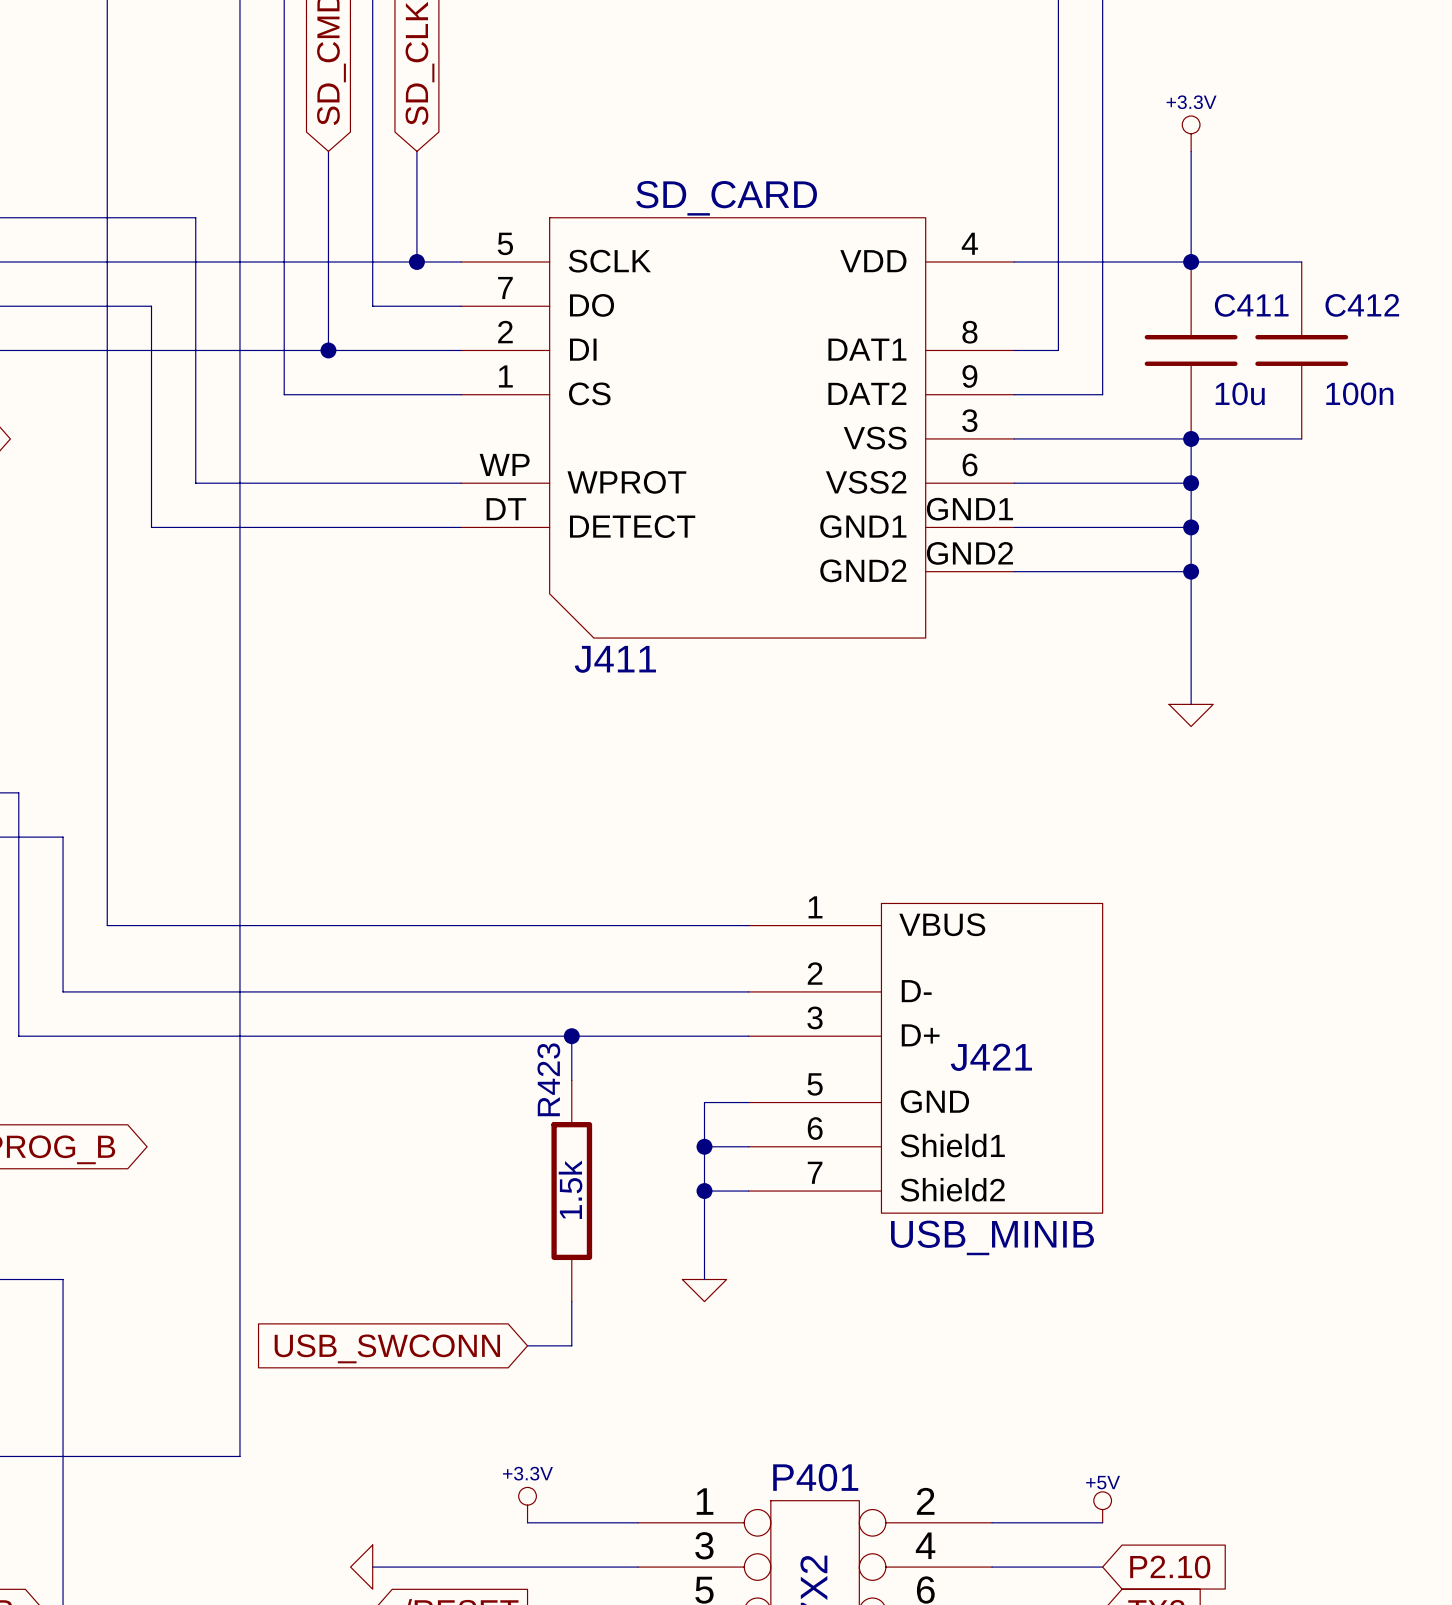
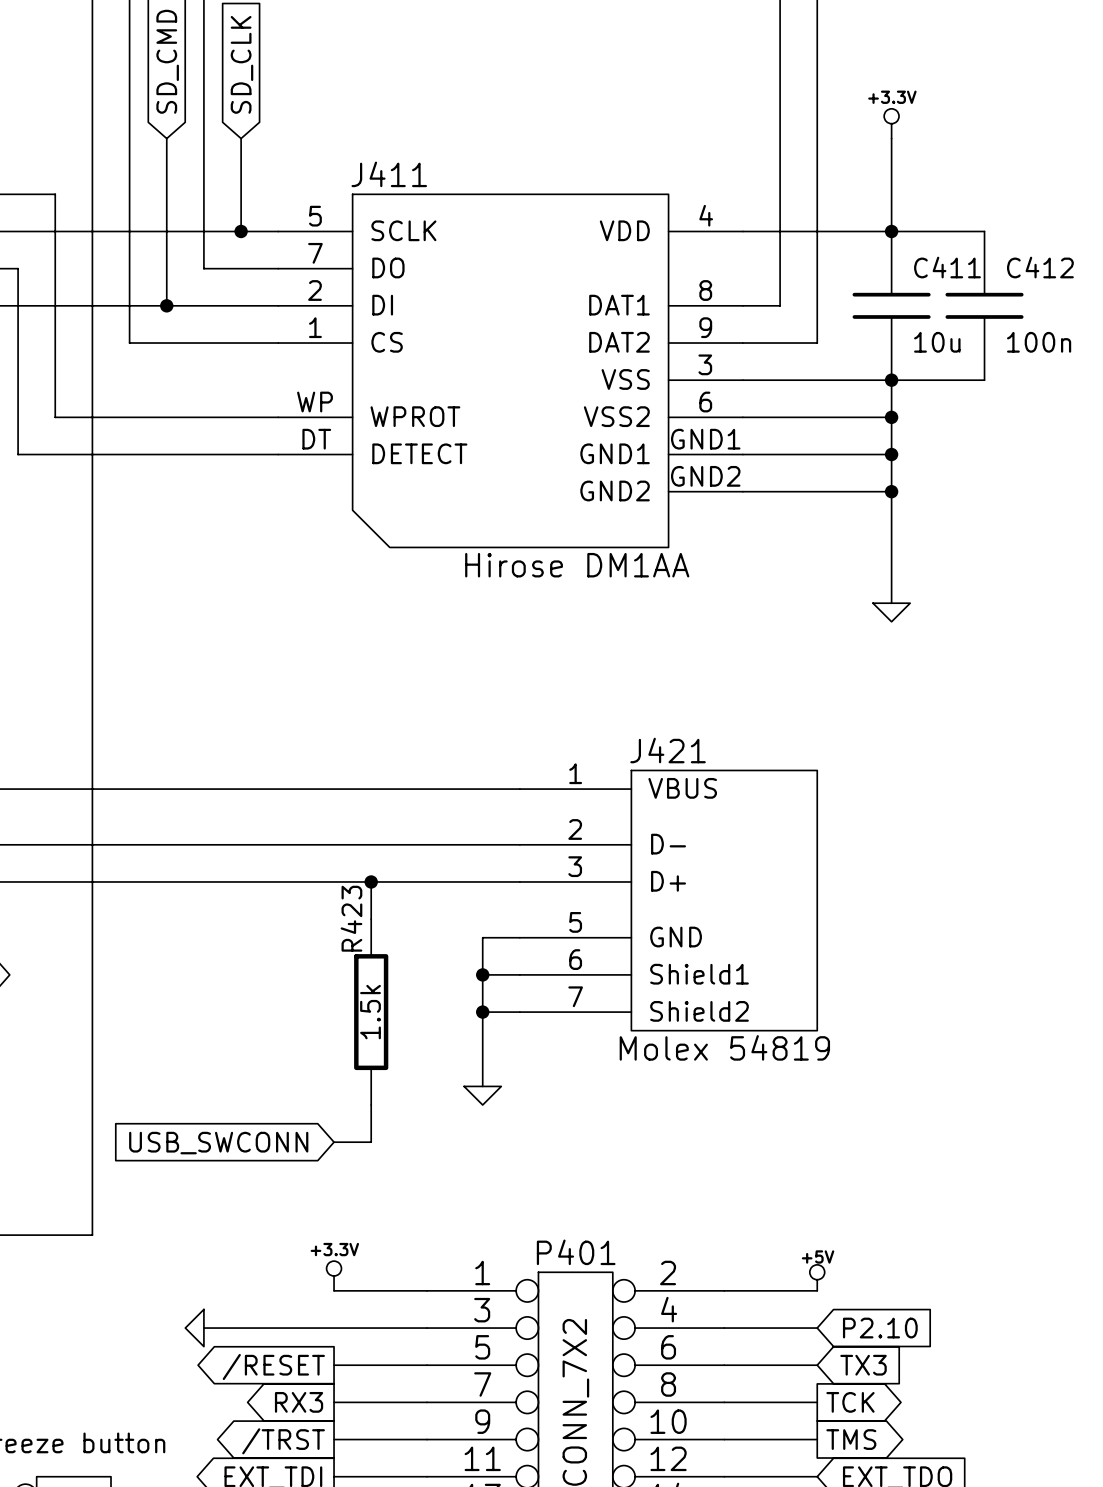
J411 value: SD_CARD (726, 198) -> Hirose DM1AA (577, 565)
J411 name position: J411 (615, 659) -> J411 (389, 174)
J421 name position: J421 (991, 1057) -> J421 (668, 750)
J421 value: USB_MINIB (992, 1237) -> Molex 54819 (724, 1047)

